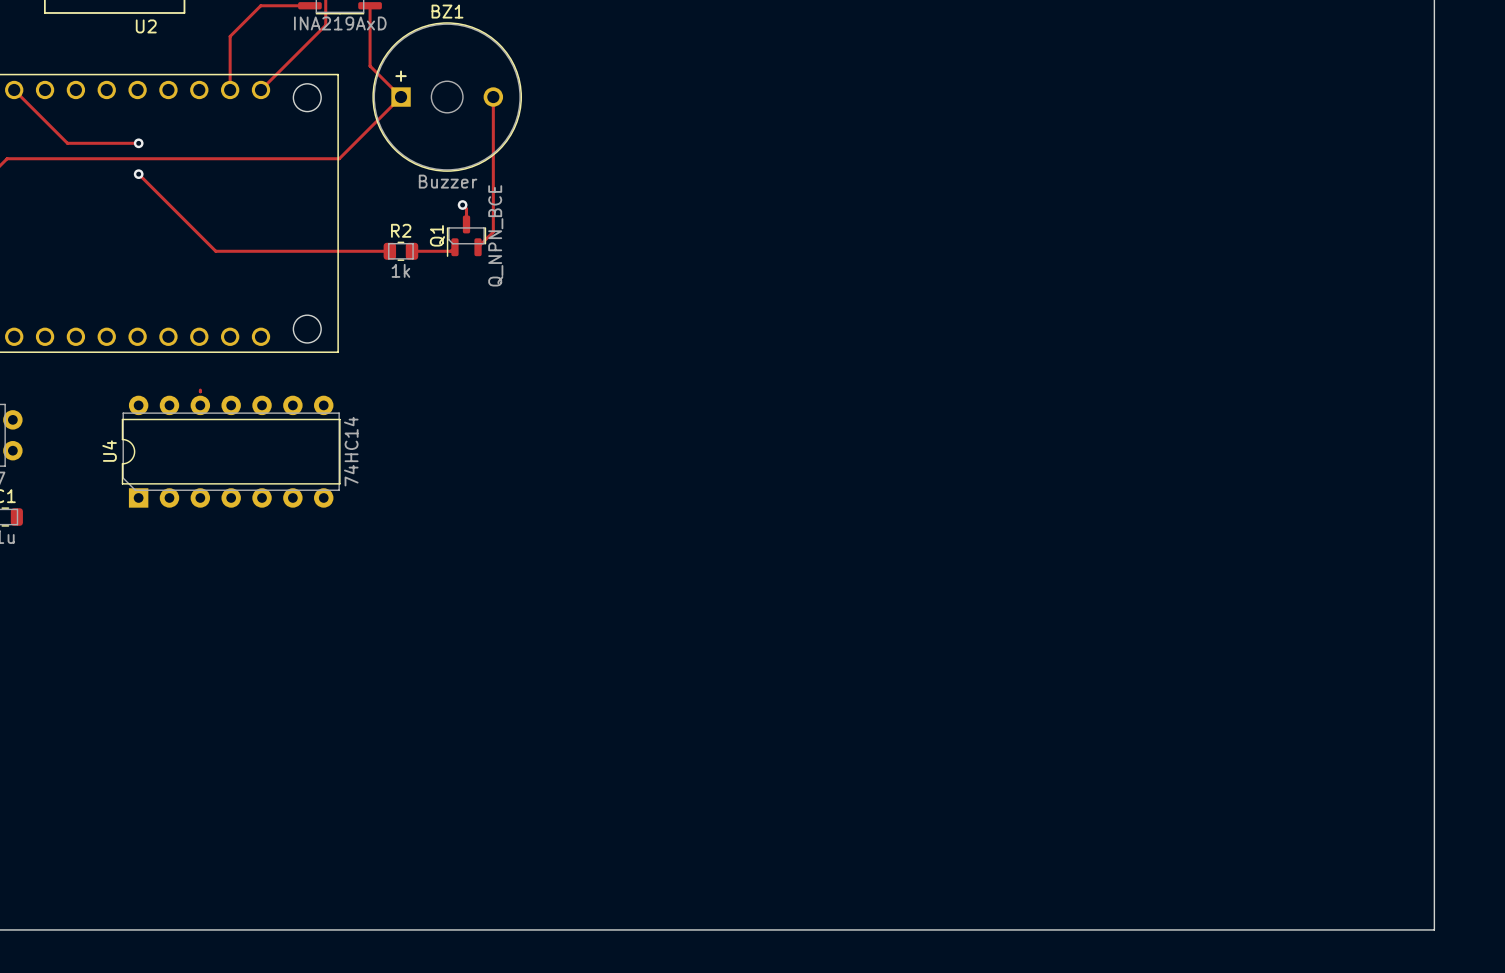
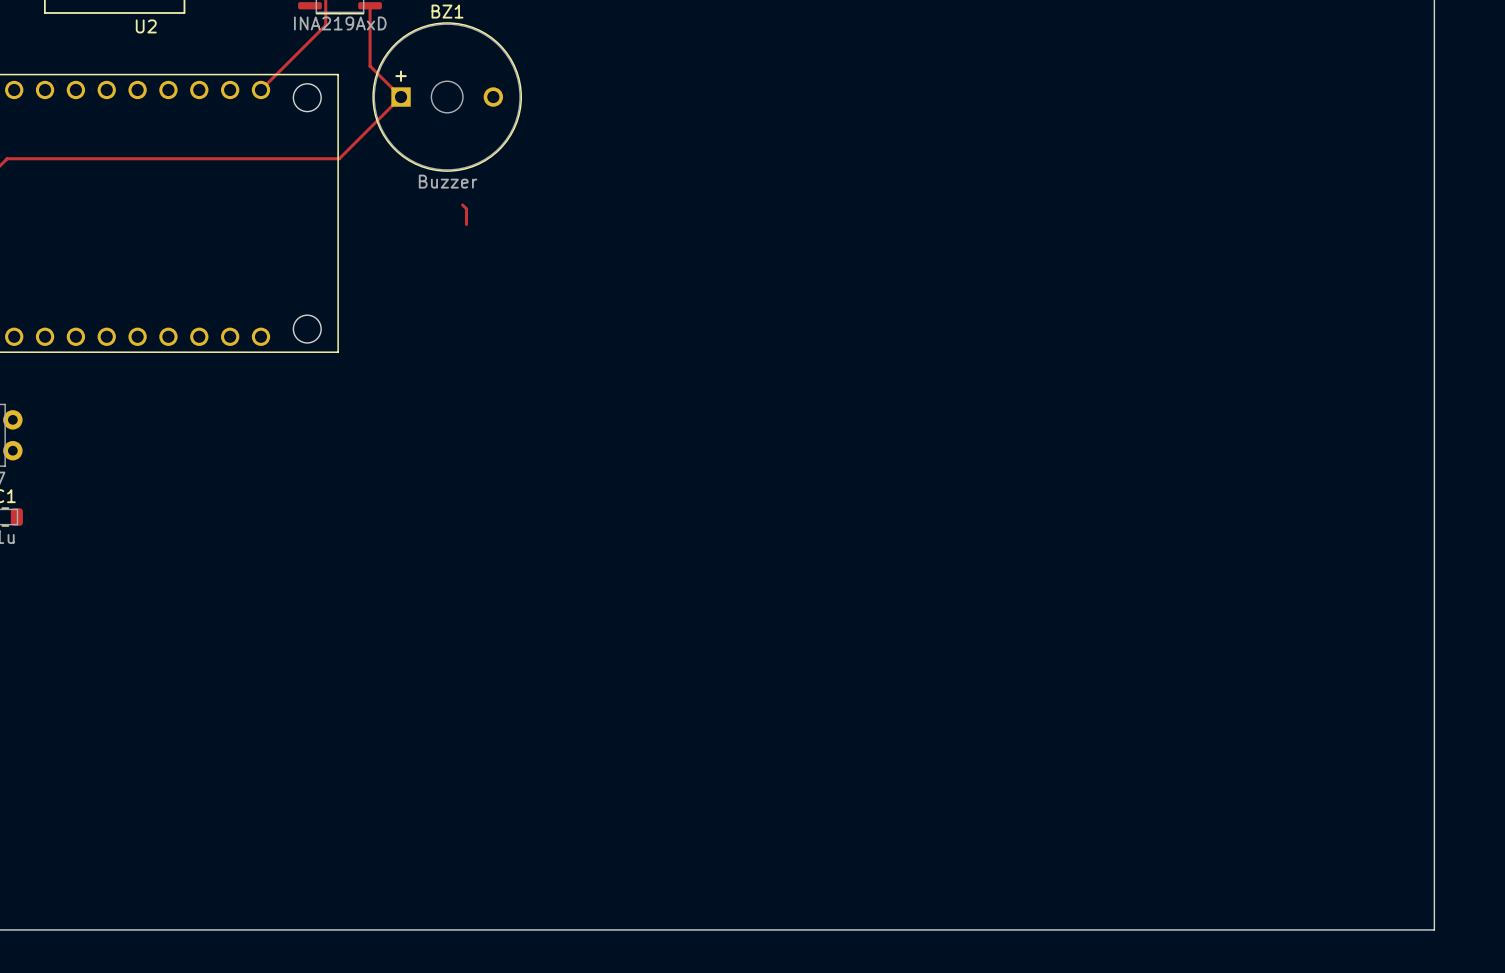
track: (309, 5) (260, 5) (230, 36) (230, 89) -> none
track: (14, 89) (67, 143) (138, 143) -> none
track: (493, 97) (493, 231) (478, 247) -> none
via: (138, 143) -> none
track: (138, 174) (215, 251) (389, 251) -> none
via: (138, 174) -> none
via: (462, 205) -> none
Q1: Q_NPN_BCE (466, 236) -> none
track: (454, 247) (450, 251) (411, 251) -> none
R2: 1k (400, 251) -> none
track: (200, 390) (200, 391) -> none
U4: 74HC14 (231, 451) -> none

